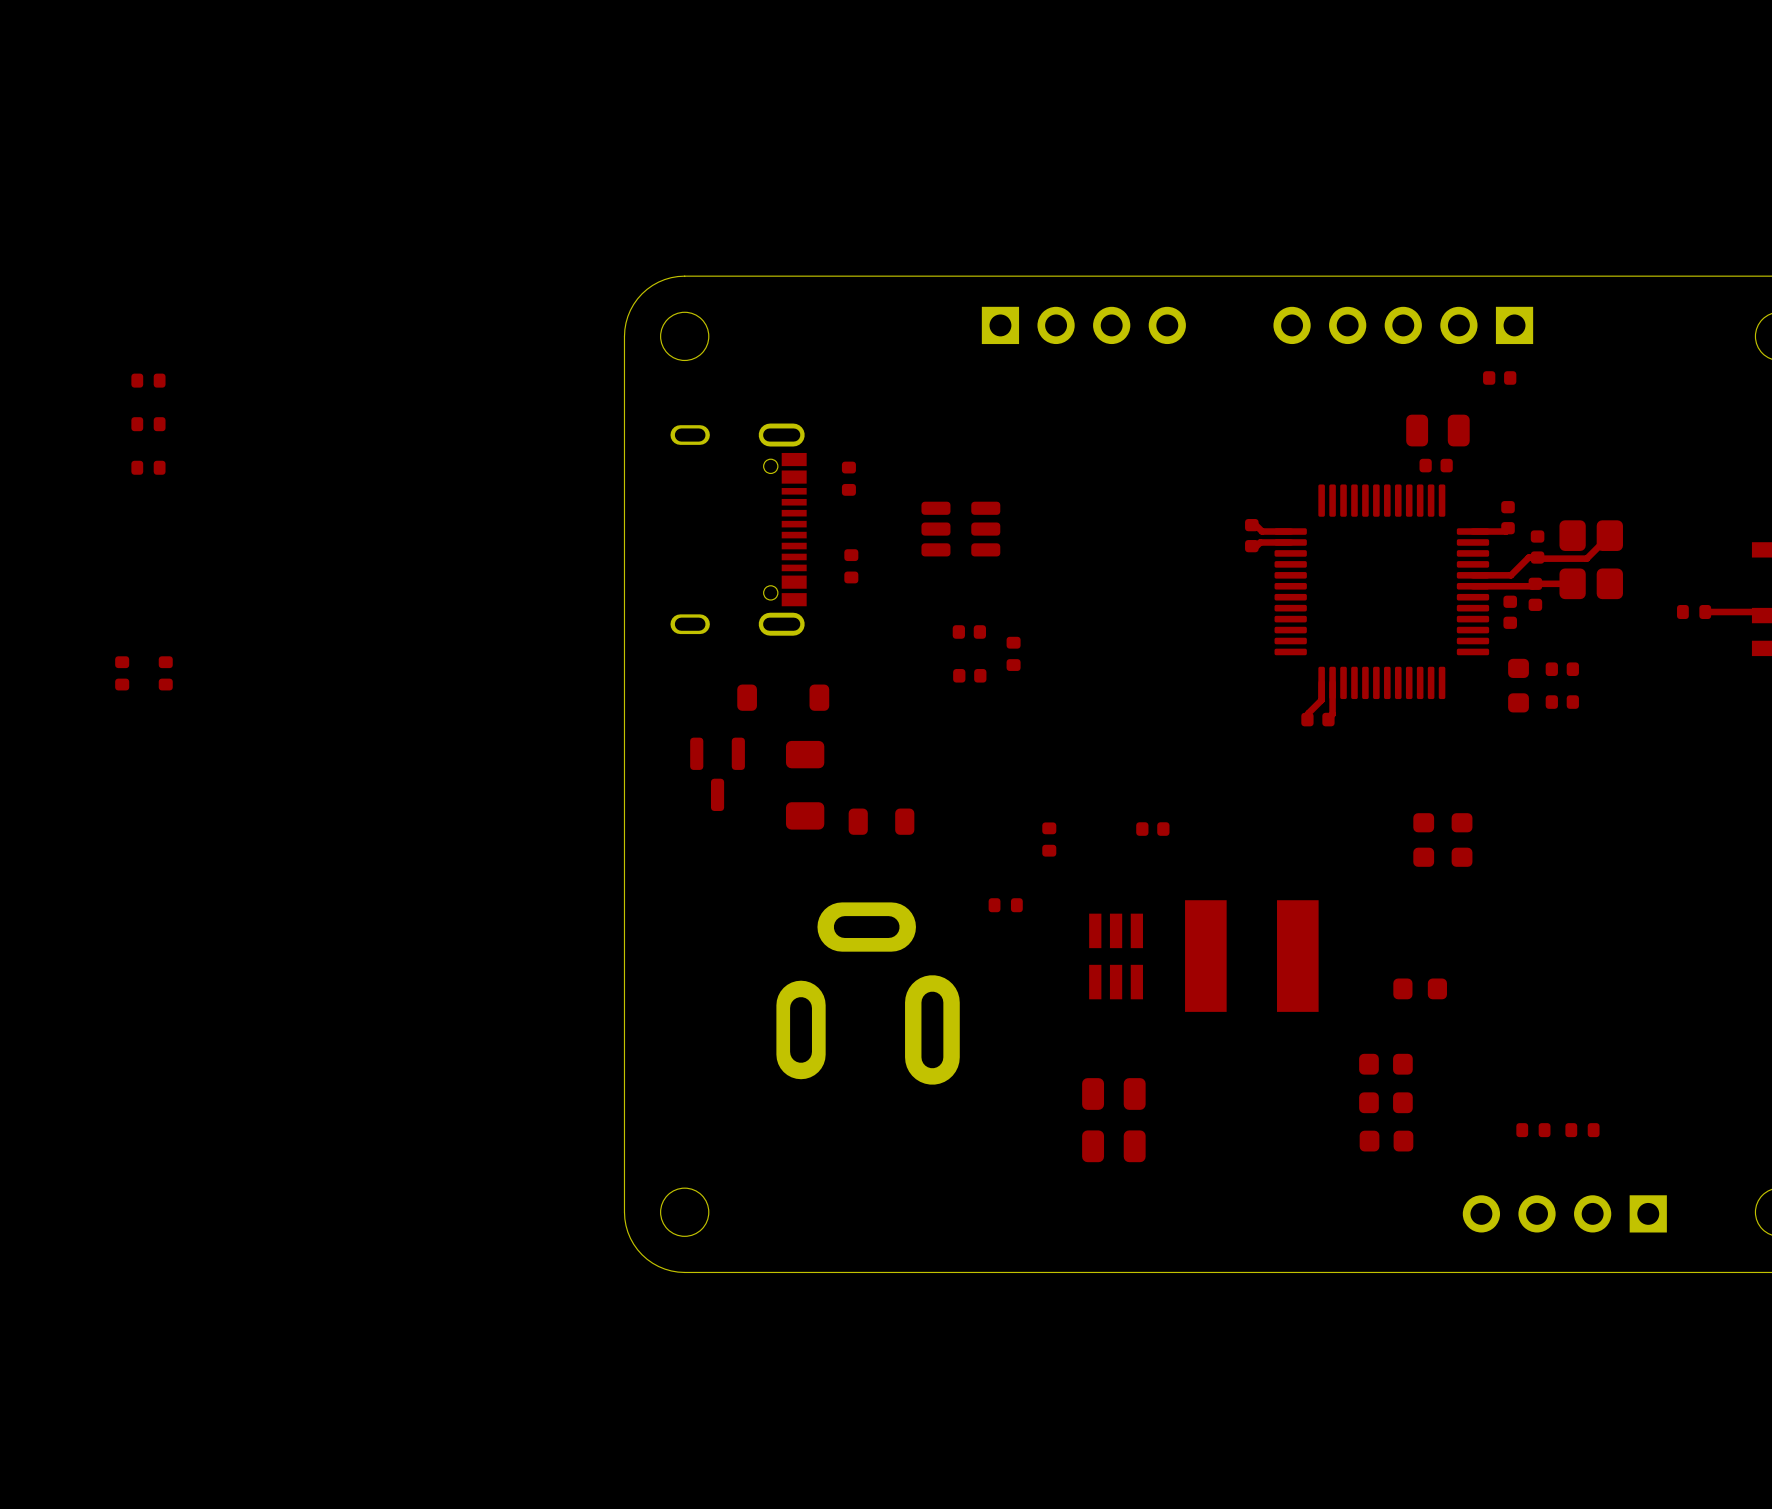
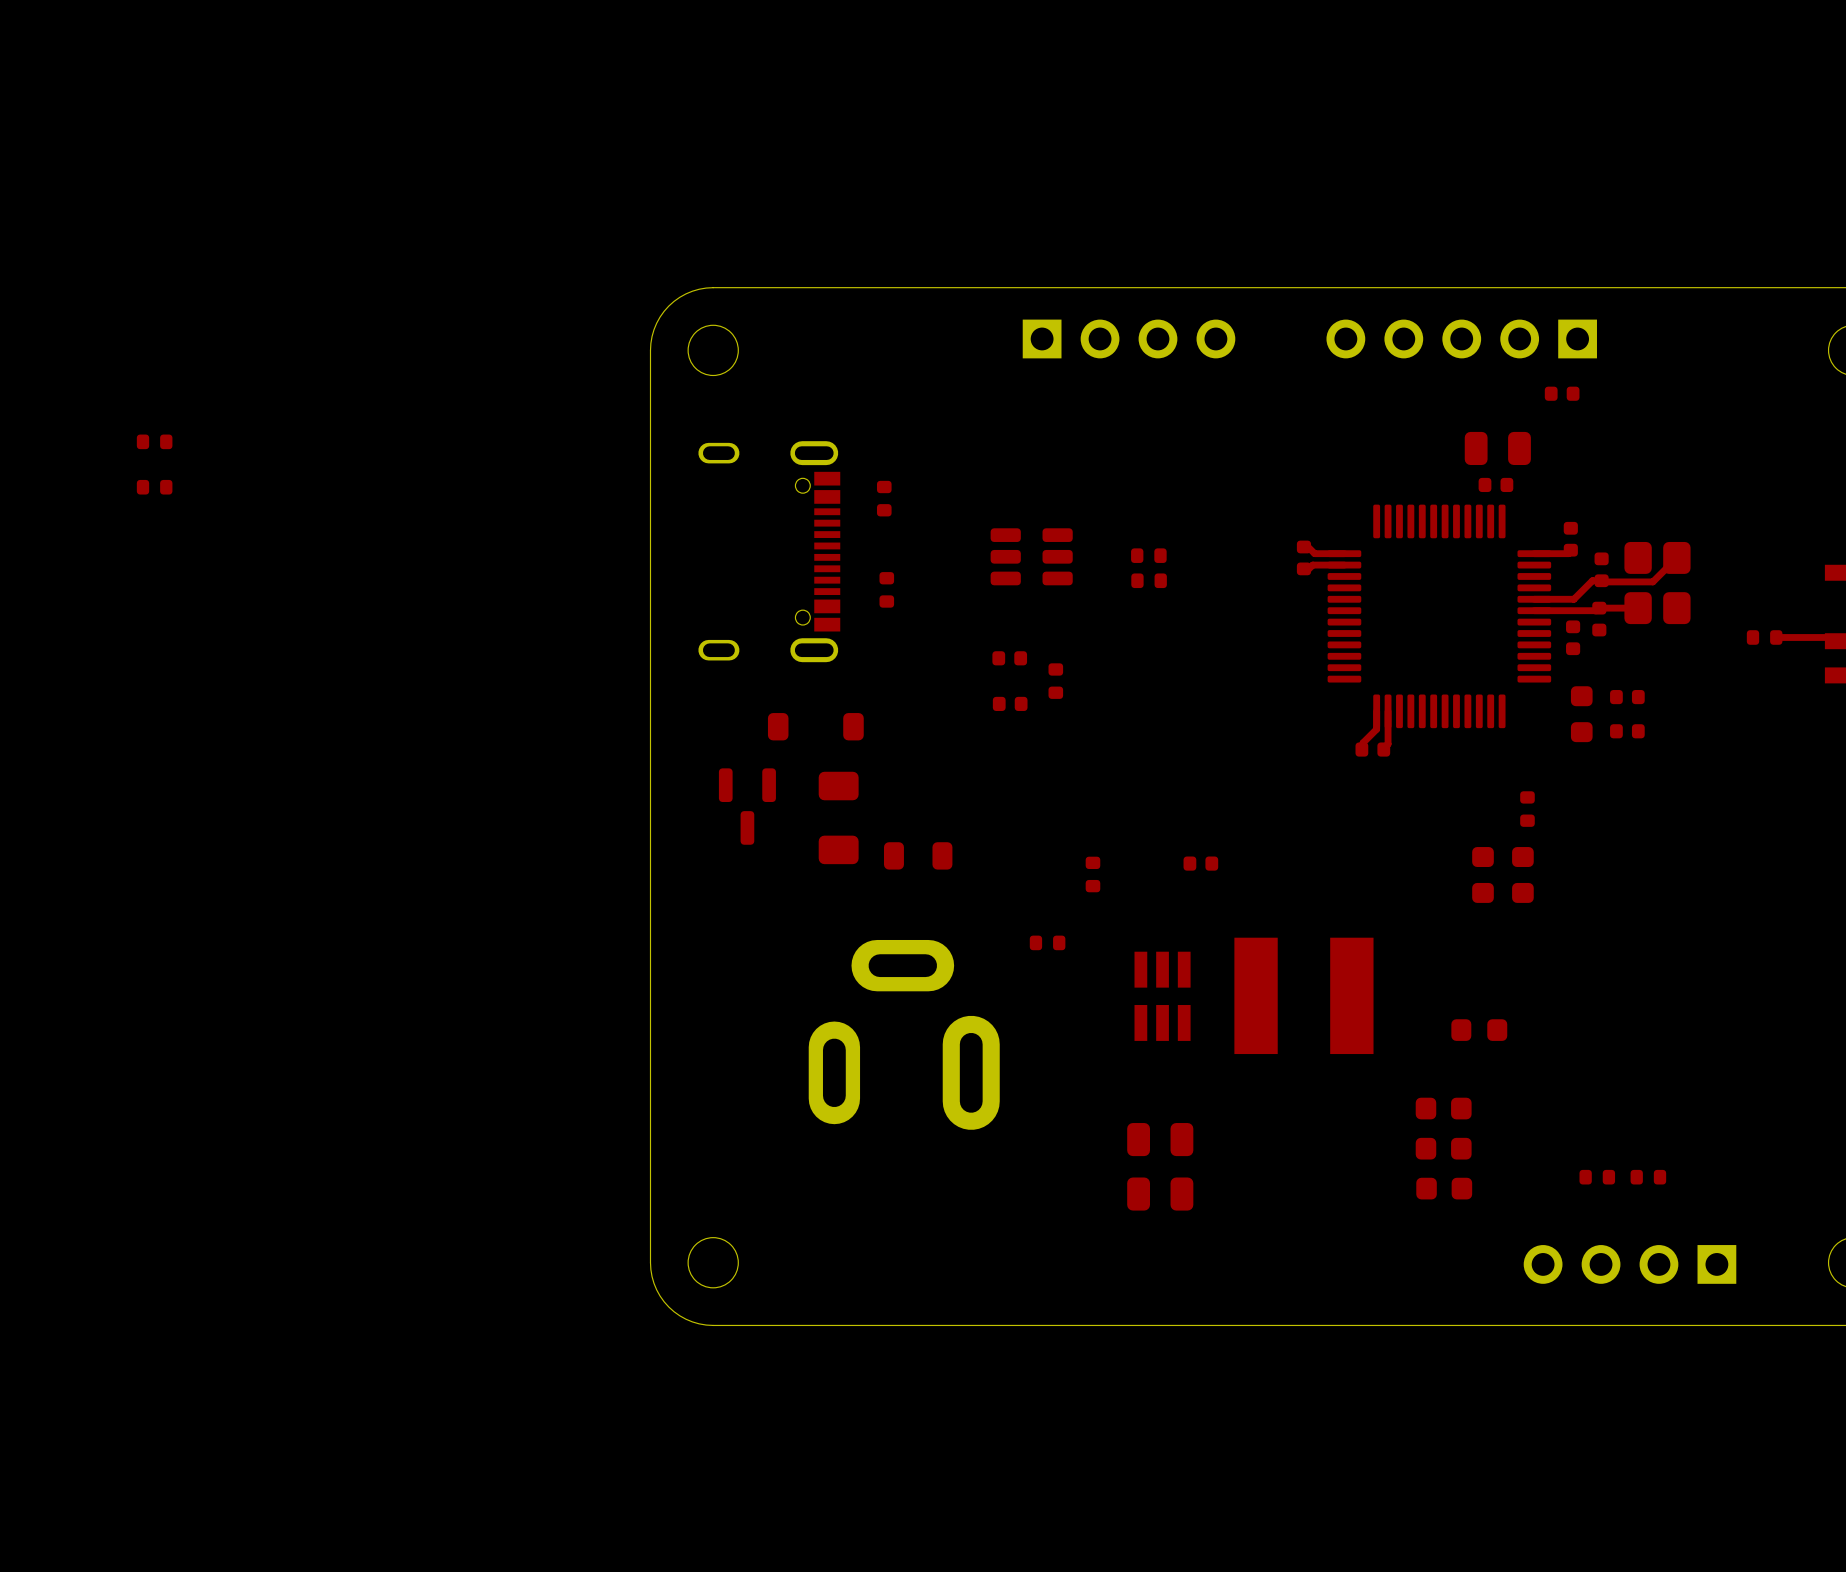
part: (148, 380) -> none
part position: (960, 529) -> (1031, 556)
part: none -> (1148, 555)
part: none -> (1149, 580)
part: (122, 673) -> none
part: (165, 673) -> none
part: none -> (1527, 809)

